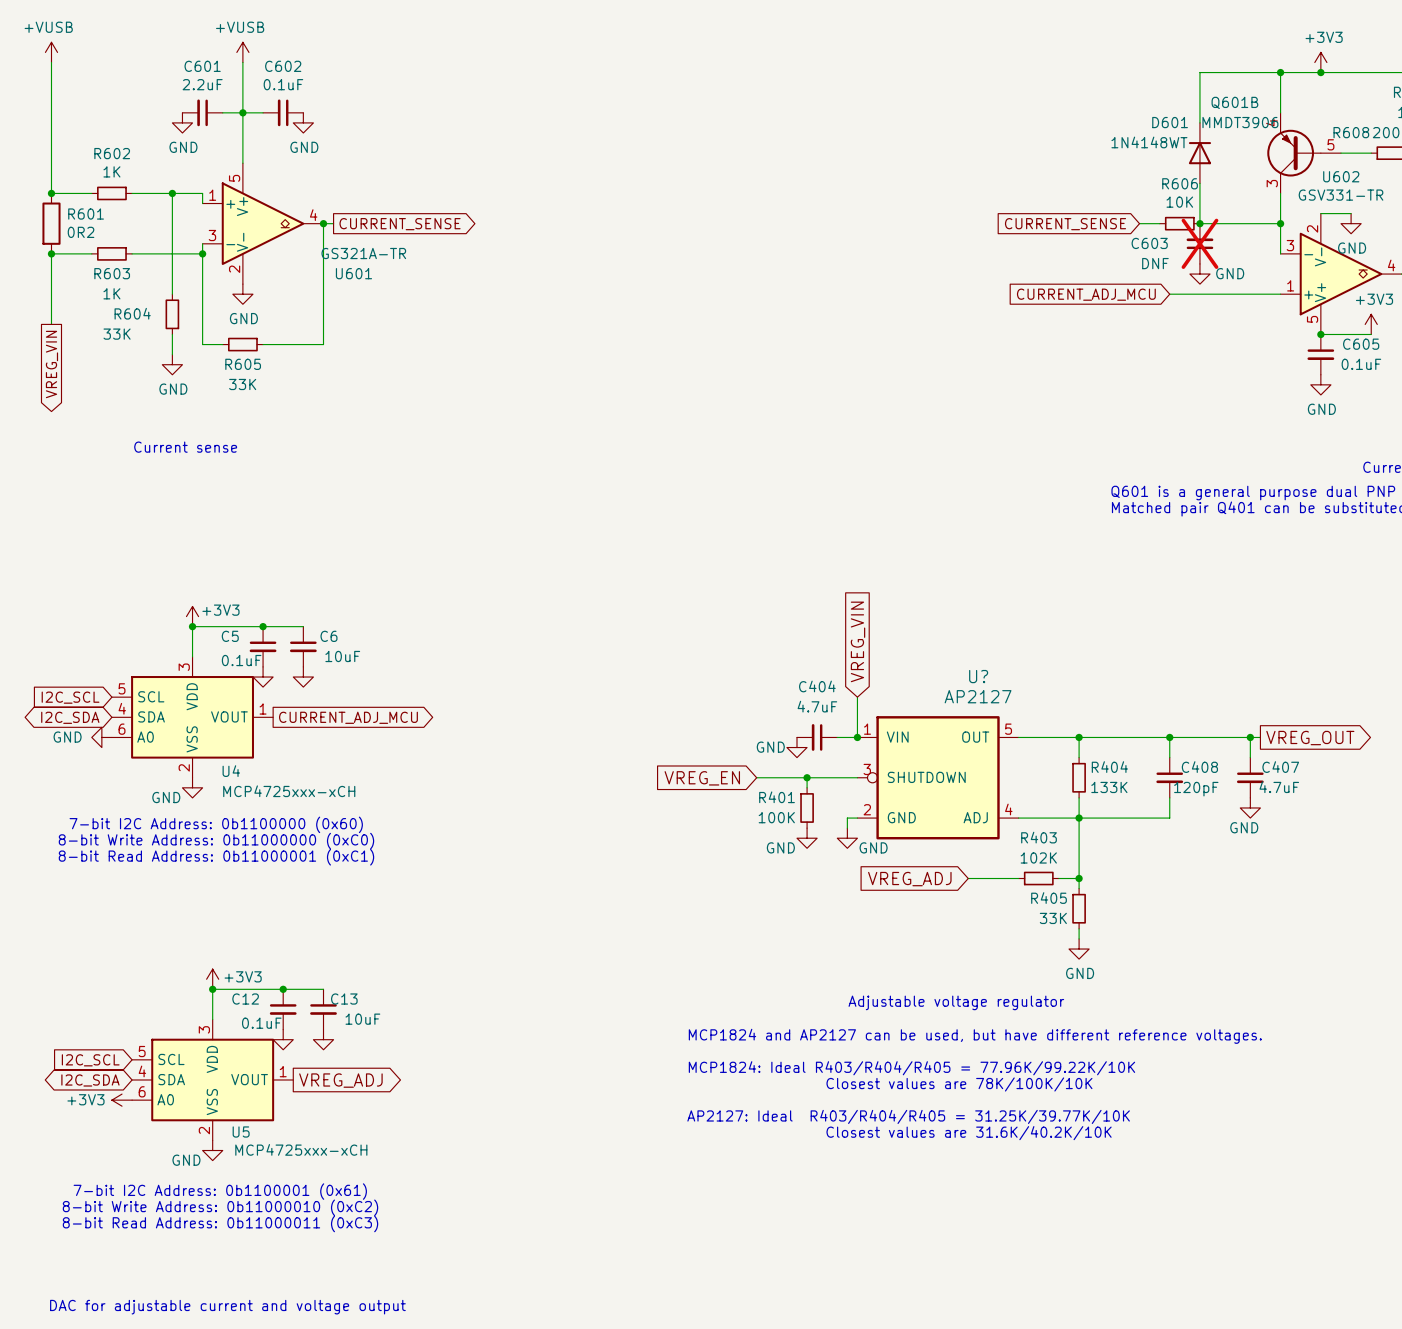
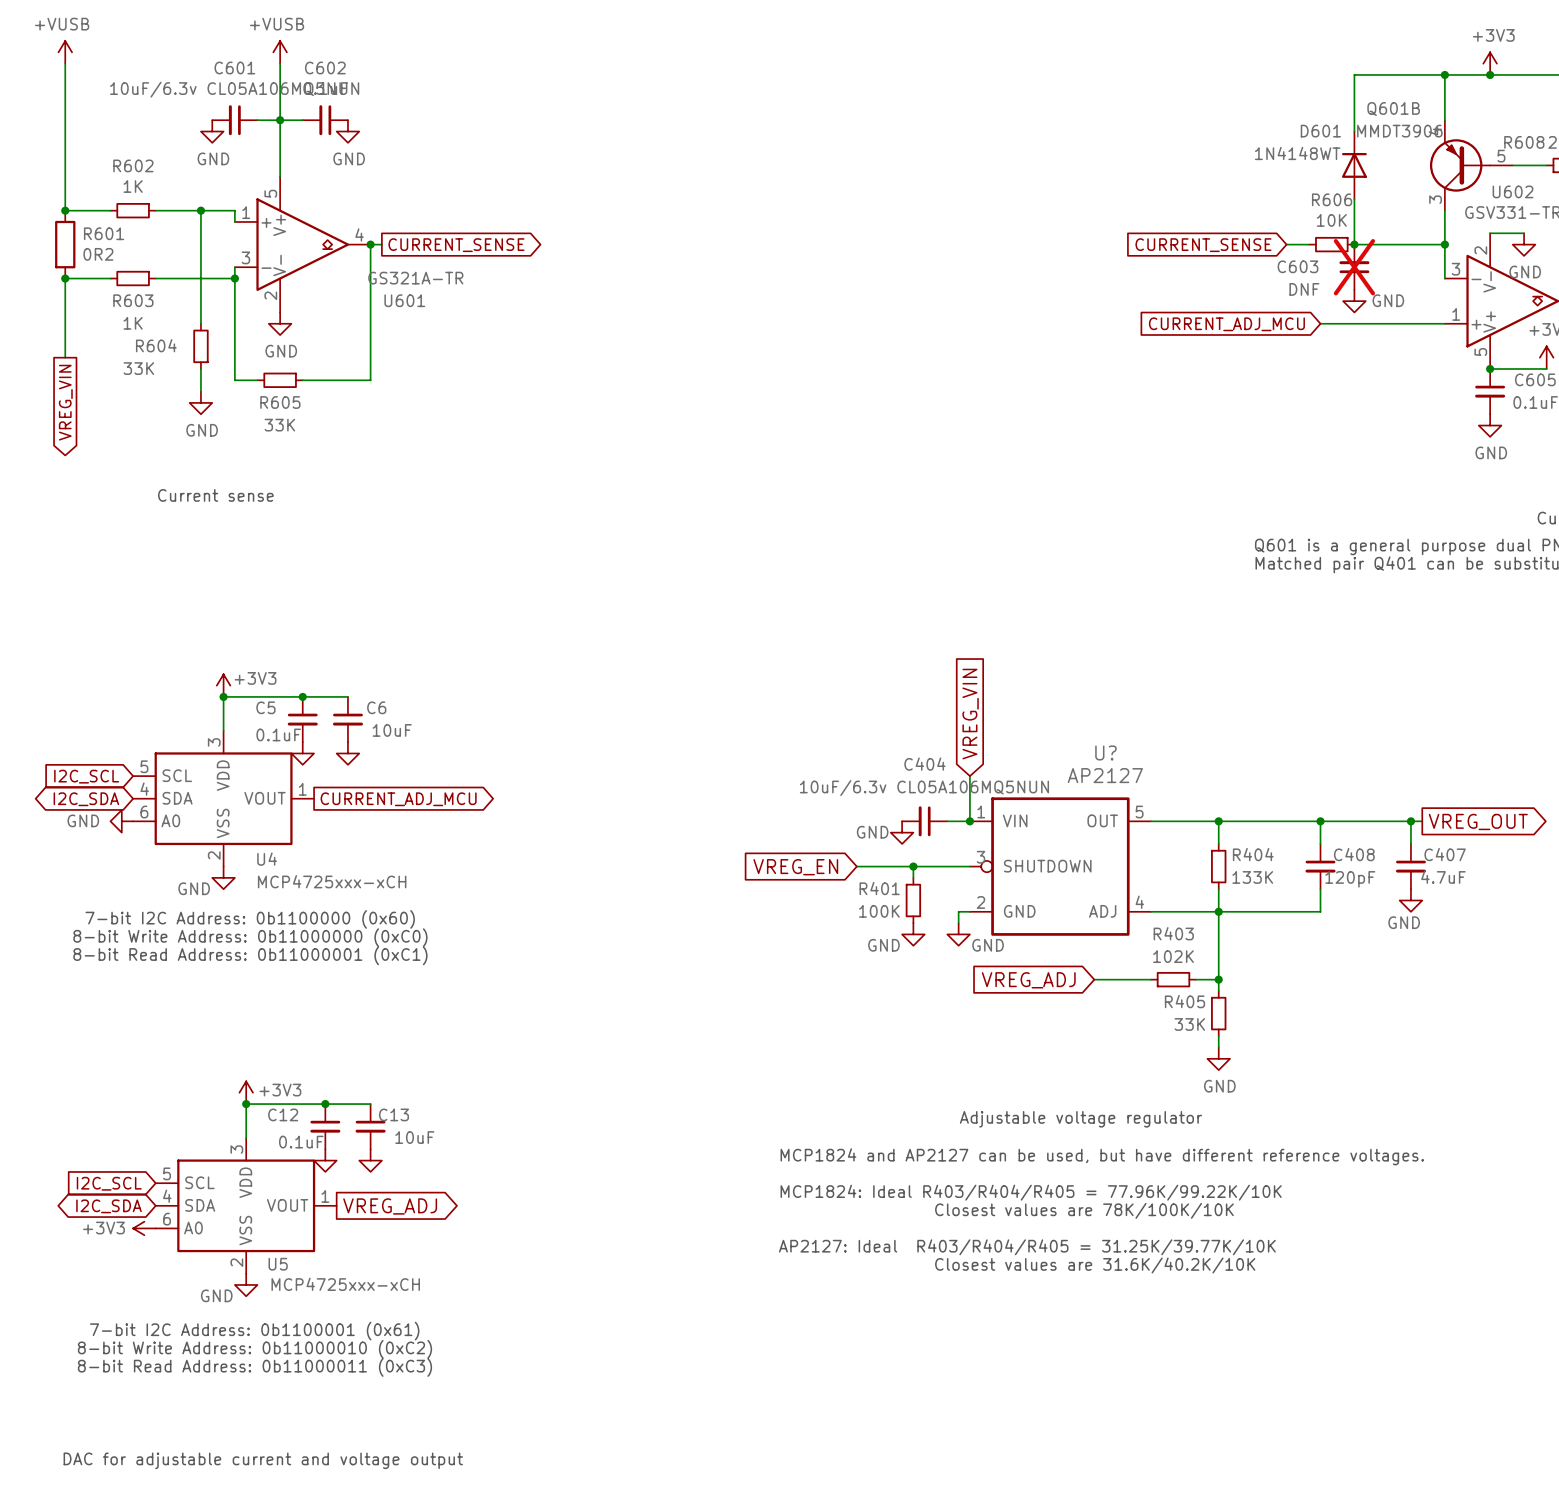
C601 value: 2.2uF (202, 84) -> 10uF/6.3v CL05A106MQ5NUN (234, 89)
C404 value: 4.7uF (817, 706) -> 10uF/6.3v CL05A106MQ5NUN (924, 788)

